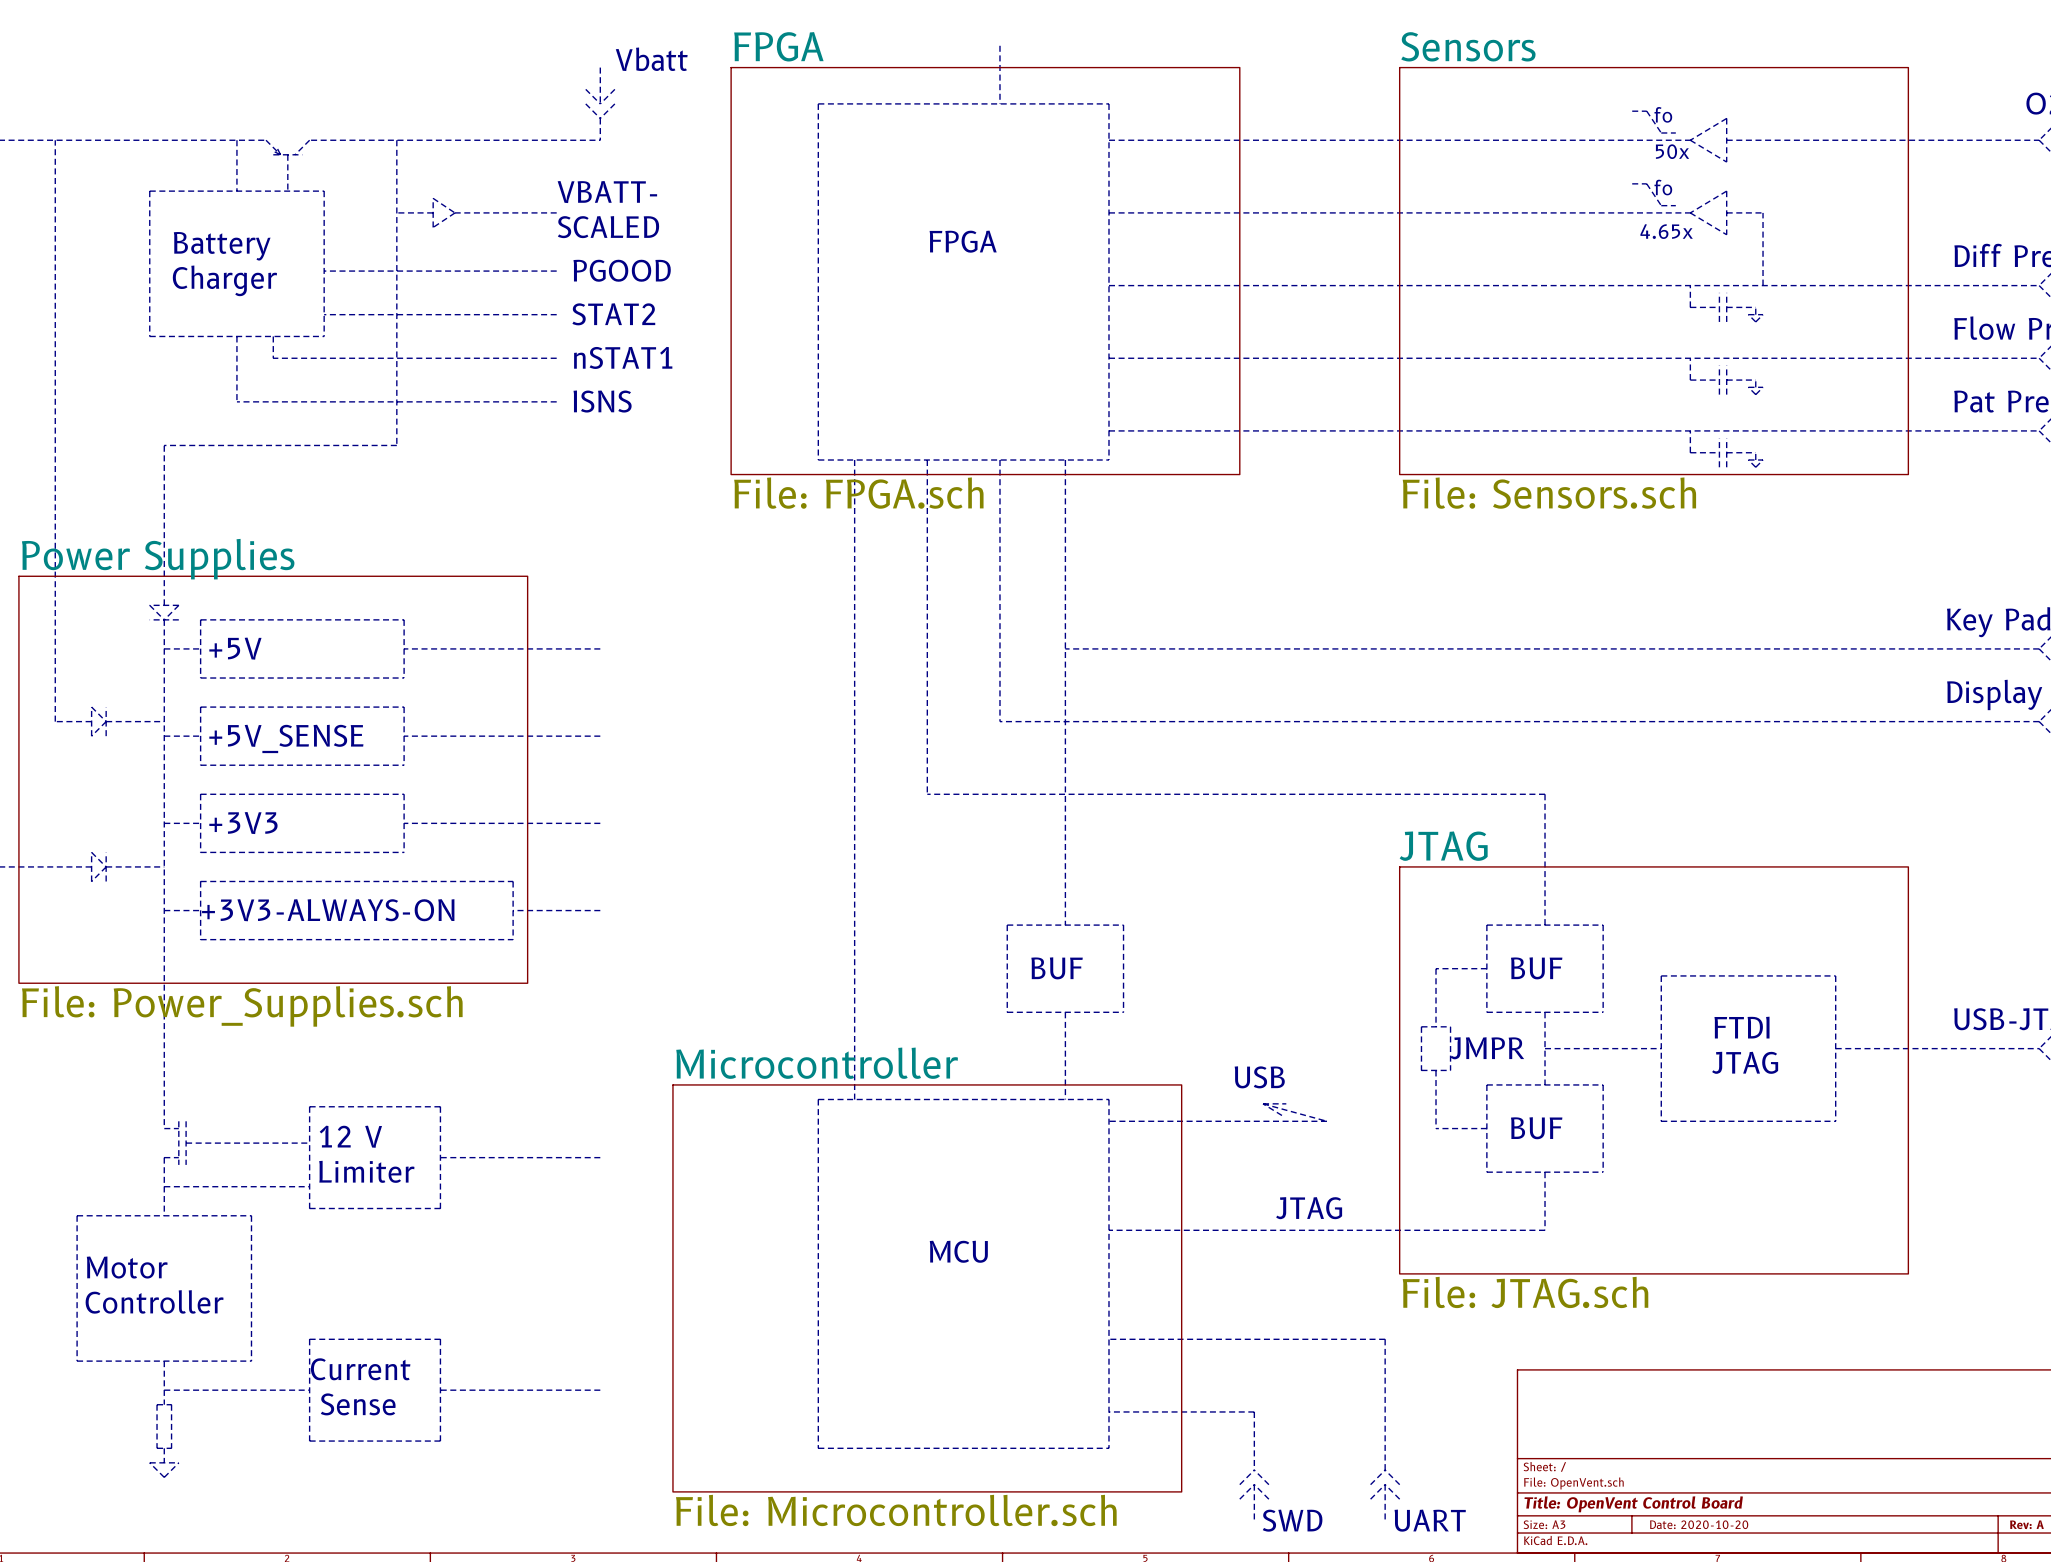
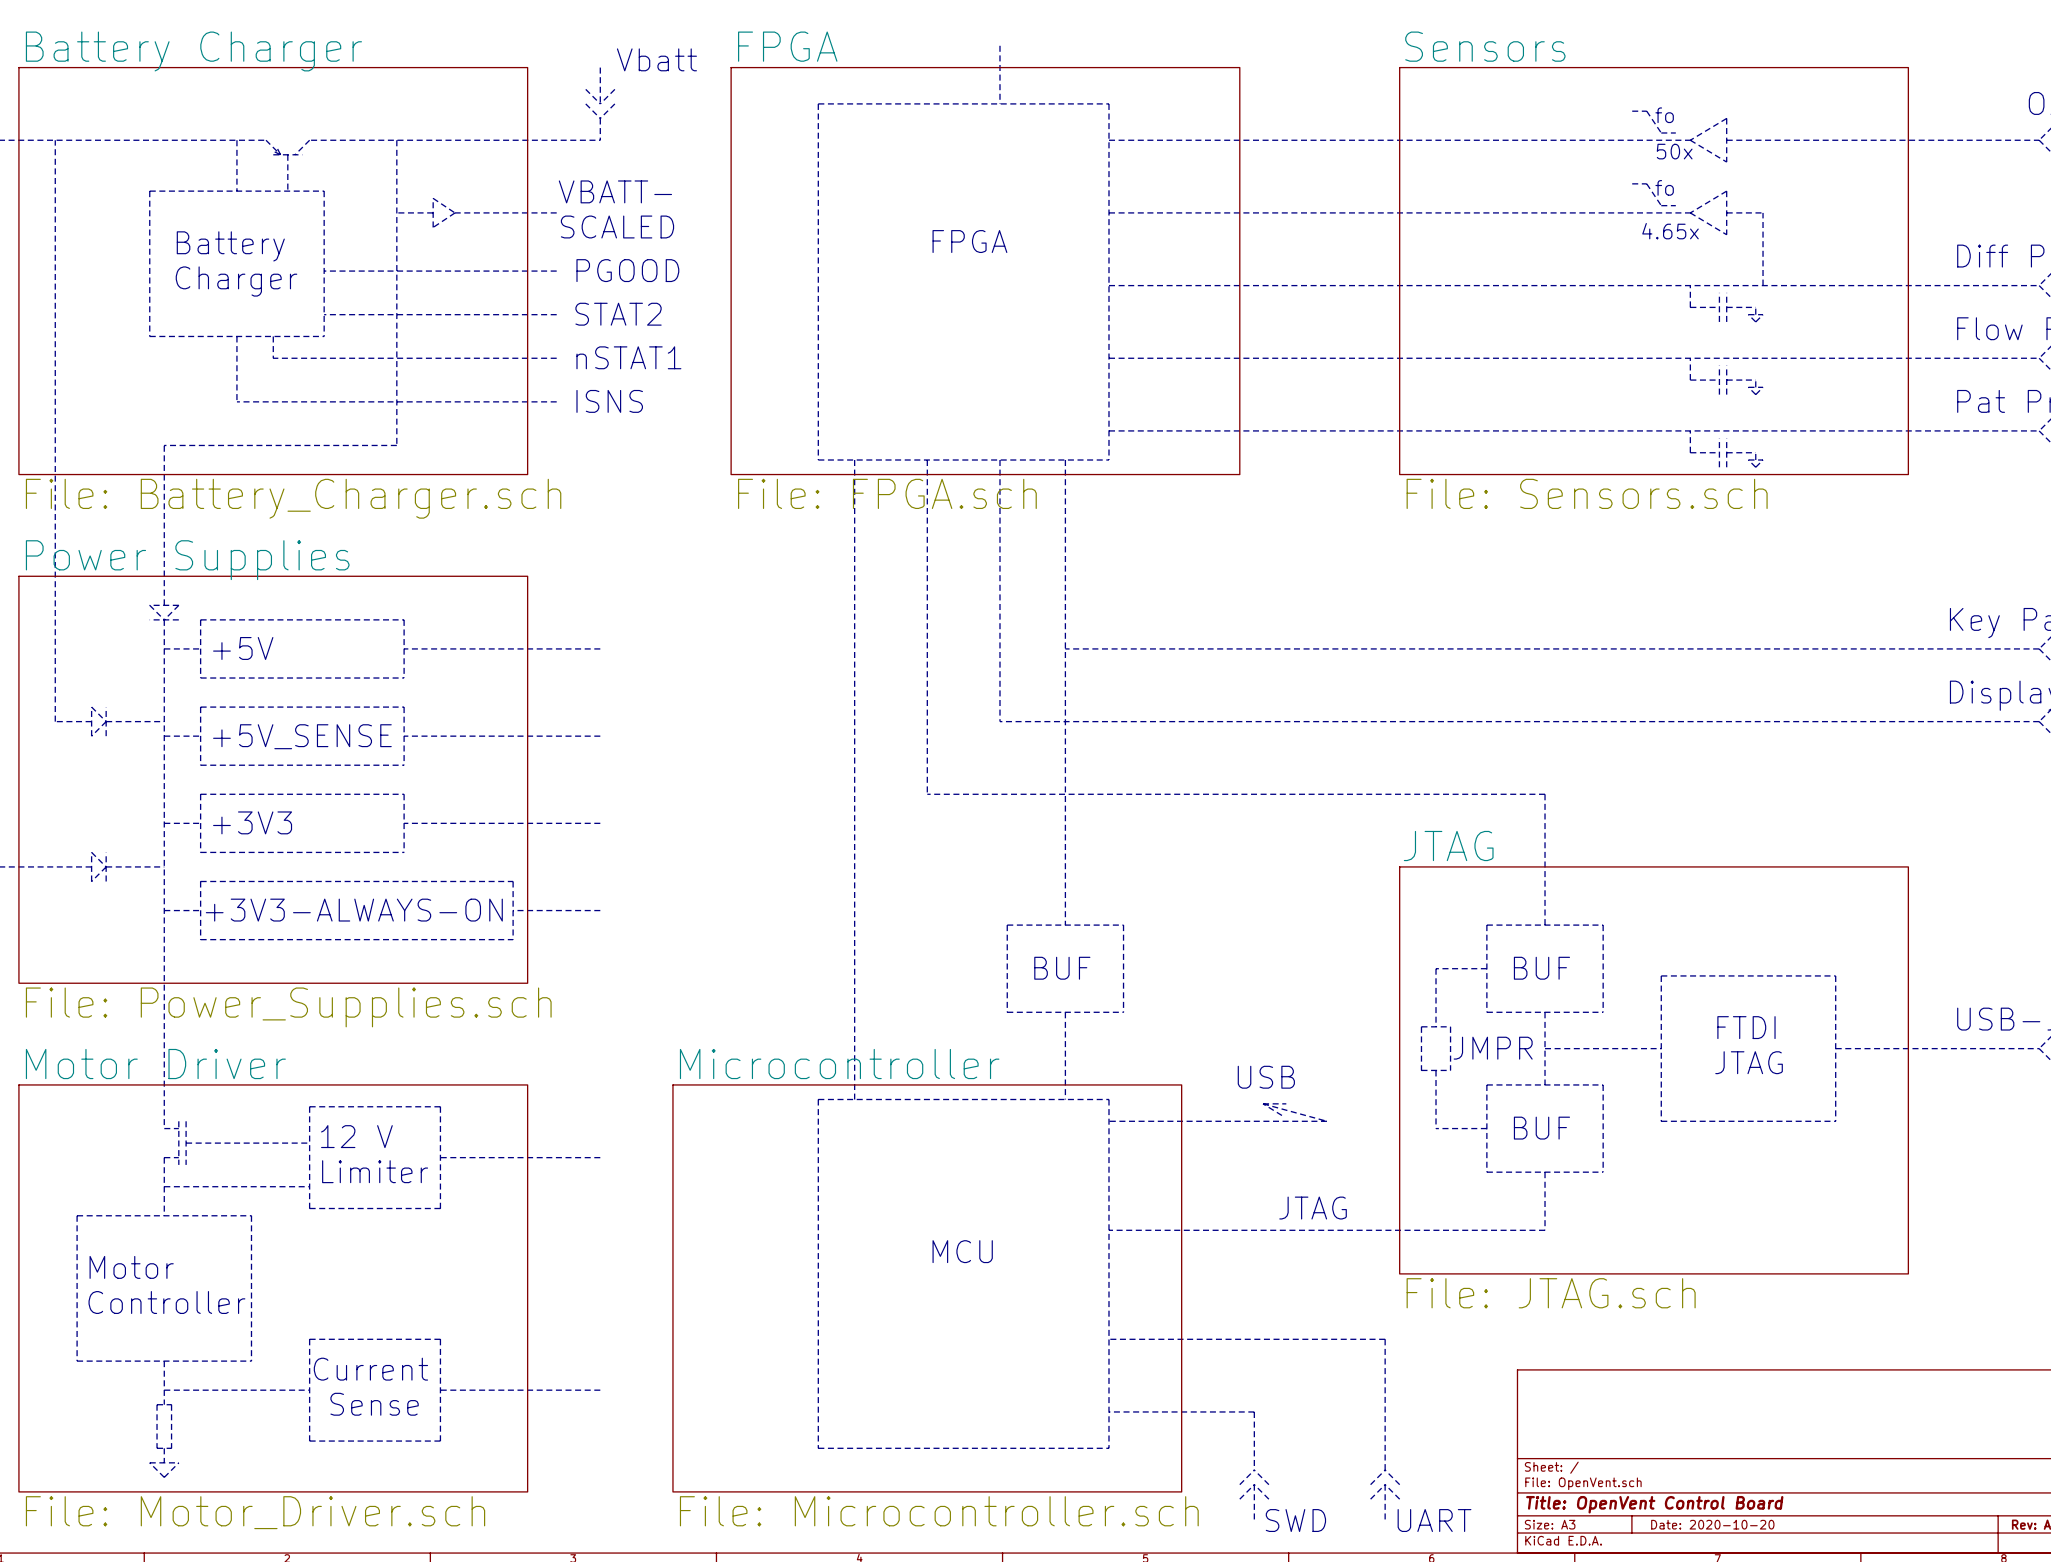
sheet Battery Charger: none -> File: Battery_Charger.sch (273, 271)
sheet Motor Driver: none -> File: Motor_Driver.sch (273, 1288)

